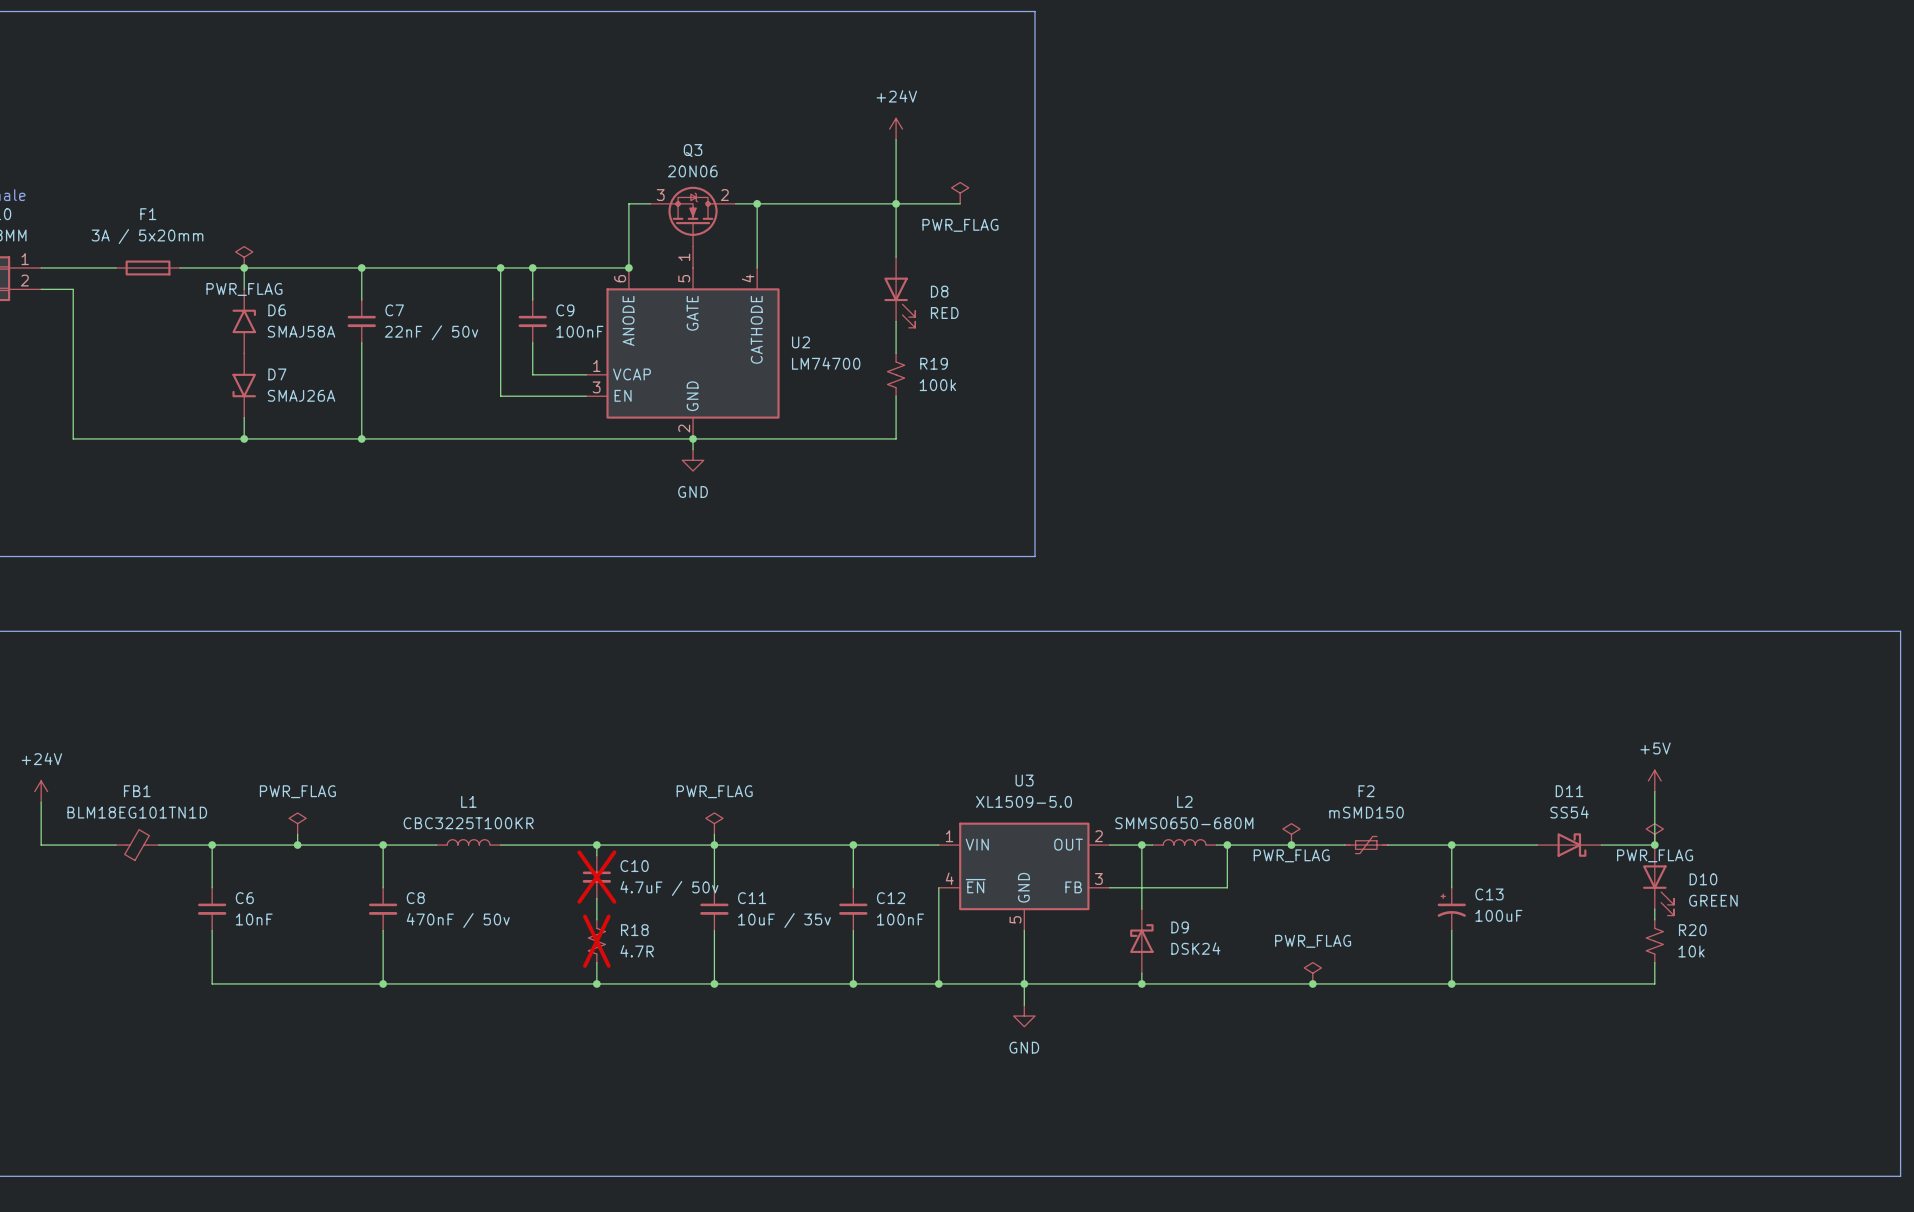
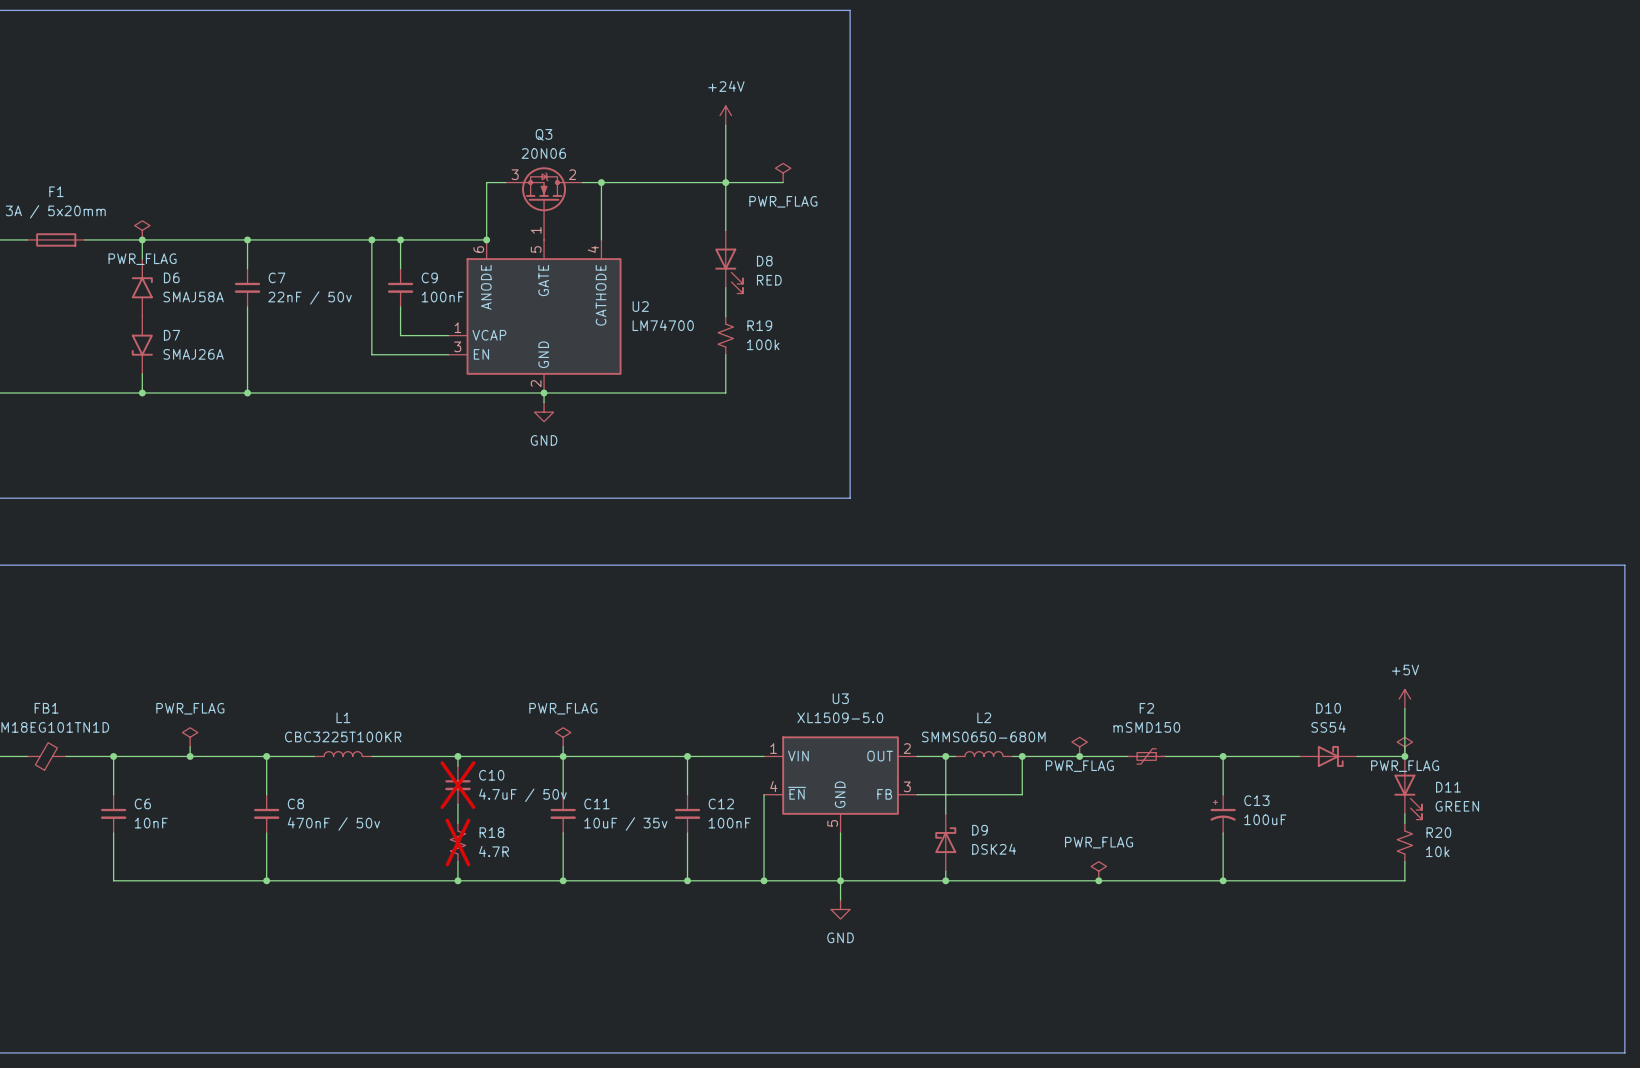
D11 name: D11 (1569, 791) -> D10 (1328, 708)
D10 name: D10 (1703, 879) -> D11 (1448, 787)

